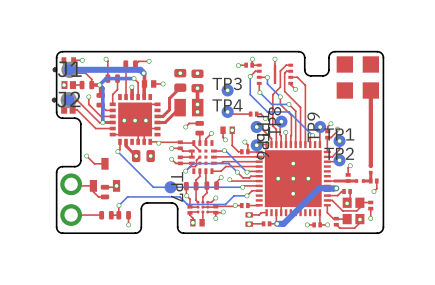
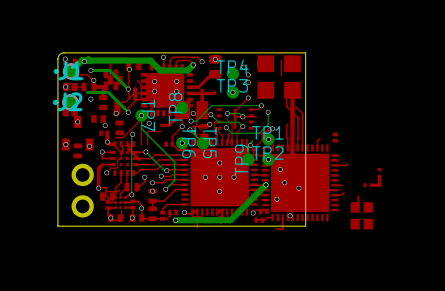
board edge: (298, 51) (303, 54) (304, 71) (310, 75) (327, 74) (329, 56) (333, 51) (378, 51) (382, 55) (383, 227) (381, 231) (182, 233) (177, 228) (177, 206) (171, 202) (143, 204) (141, 208) (141, 228) (136, 233) (61, 233) (57, 229) (56, 221) -> (305, 52) (305, 226) (57, 226)
top track: none -> (163, 57) (163, 65)
via: none -> (163, 57)
via: none -> (65, 59)
via: none -> (215, 59)
via: (106, 59) -> none
via: (252, 59) -> none
via: (274, 59) -> none
top track: none -> (202, 61) (197, 57) (173, 57) (169, 60) (169, 65)
via: none -> (202, 61)
via: (149, 61) -> none
top track: none -> (193, 64) (189, 60) (177, 60) (176, 65)
via: none -> (193, 64)
part footprint: [256, 63, 294, 85] -> [257, 55, 301, 99]
part: none -> (215, 66)
top track: (246, 65) (238, 65) -> none
part: (249, 65) -> none
top track: (290, 65) (286, 65) (280, 71) (280, 87) (272, 94) (272, 125) (276, 129) (276, 144) -> none
via: none -> (129, 69)
bottom track: none -> (90, 70) (109, 70) (128, 89)
via: none -> (90, 70)
bottom track: (69, 69) (140, 69) (143, 73) -> (71, 71) (81, 60) (88, 59) (150, 60) (160, 70) (187, 70) (193, 64)
top track: (259, 71) (255, 71) (250, 76) -> none
top track: (290, 71) (284, 73) (284, 91) (300, 107) (300, 144) -> none
part: none -> (110, 73)
top track: none -> (215, 74) (211, 74) (198, 87) (191, 87)
via: (143, 73) -> none
via: (180, 73) -> none
via: (197, 73) -> none
via: none -> (248, 74)
bottom track: (250, 76) (250, 94) (267, 111) (288, 111) (312, 135) -> none
via: (250, 76) -> none
top track: (259, 77) (267, 77) -> none
bottom track: (267, 77) (267, 83) (280, 96) -> none
via: (267, 77) -> none
top track: (290, 77) (297, 77) (305, 85) (305, 144) -> none
part: (357, 77) -> none
via: none -> (93, 80)
top track: (117, 78) (117, 89) (112, 94) (112, 104) -> none
bottom track: (134, 78) (106, 78) (99, 85) (102, 88) (102, 122) -> none
via: (134, 78) -> none
via: none -> (154, 81)
via: none -> (176, 81)
part: (180, 80) -> none
via: none -> (248, 82)
part: (197, 81) -> none
part: none -> (110, 85)
part position: (149, 83) -> (98, 118)
top track: (163, 83) (153, 83) -> none
via: (163, 83) -> none
top track: (259, 83) (259, 92) -> none
top track: (290, 83) (295, 89) -> none
via: (99, 85) -> none
via: none -> (128, 89)
via: (131, 87) -> none
top track: (180, 87) (169, 98) (169, 109) (162, 116) (157, 116) -> none
via: (197, 88) -> none
top track: none -> (292, 90) (292, 157)
via: none -> (154, 91)
via: none -> (176, 91)
via: (295, 89) -> none
bottom track: none -> (87, 92) (108, 92) (128, 112)
top track: none -> (215, 92) (191, 93)
top track: (370, 90) (370, 165) -> none
top track: none -> (142, 93) (134, 93) (125, 102) (117, 102) (116, 113)
bottom track: (259, 92) (271, 104) (288, 104) -> none
via: (259, 92) -> none
top track: none -> (248, 98) (235, 111) (235, 118)
via: none -> (248, 98)
top track: (88, 96) (88, 104) (100, 116) (112, 116) -> none
via: (280, 96) -> none
top track: none -> (142, 99) (136, 99) (128, 107) (128, 112)
top track: none -> (261, 105) (257, 109) (251, 109)
bottom track: none -> (261, 105) (211, 105) (205, 112)
via: none -> (261, 105)
via: (197, 104) -> none
via: (288, 104) -> none
top track: (100, 105) (105, 110) (112, 110) -> none
top track: (64, 109) (64, 105) (68, 101) (78, 101) (99, 122) (112, 122) -> none
top track: (72, 109) (77, 109) (95, 128) (112, 128) -> none
via: none -> (128, 112)
bottom track: none -> (205, 112) (196, 121) (191, 121)
bottom track: none -> (268, 112) (268, 124) (259, 133) (231, 133) (226, 127)
via: none -> (268, 112)
via: none -> (116, 113)
top track: none -> (193, 113) (196, 116) (196, 125) (207, 136) (207, 140)
via: none -> (193, 113)
top track: none -> (227, 113) (227, 120) (232, 124) (232, 140)
bottom track: none -> (227, 113) (239, 113) (242, 116)
via: none -> (227, 113)
via: (197, 111) -> none
bottom track: none -> (210, 114) (218, 122) (238, 122) (242, 126)
via: none -> (210, 114)
TP4 position: (227, 111) -> (232, 73)
via: (227, 111) -> none
board edge: (56, 112) (59, 117) (76, 118) (80, 124) (80, 163) (75, 166) (60, 167) (56, 172) -> (57, 114) (57, 176)
top track: none -> (182, 115) (182, 126) (172, 136) (172, 144) (178, 150) (183, 150)
bottom track: none -> (141, 115) (141, 128) (174, 161) (174, 180) (165, 189)
via: none -> (141, 115)
via: none -> (242, 116)
part: (253, 114) -> none
top track: (256, 114) (261, 114) (265, 118) -> none
part: none -> (235, 118)
via: none -> (191, 121)
via: (265, 118) -> none
via: none -> (77, 121)
part position: (135, 119) -> (166, 90)
top track: none -> (218, 122) (214, 123) (214, 132) (217, 135) (217, 140)
via: (124, 120) -> none
via: (135, 120) -> none
via: none -> (209, 124)
TP8 position: (281, 121) -> (182, 107)
via: (281, 121) -> none
via: none -> (182, 126)
top track: none -> (242, 126) (237, 132) (237, 140)
via: none -> (242, 126)
top track: (330, 123) (327, 127) (327, 131) -> none
via: (330, 123) -> none
via: none -> (226, 127)
part: none -> (119, 127)
top track: none -> (218, 128) (222, 140)
top track: none -> (272, 128) (262, 133) (262, 140) (256, 146) (256, 150)
via: none -> (272, 128)
top track: (256, 127) (259, 127) (271, 138) (271, 144) -> none
TP5 position: (256, 127) -> (203, 143)
via: (256, 127) -> none
top track: (320, 127) (319, 144) -> none
TP9 position: (320, 127) -> (248, 159)
via: (320, 127) -> none
top track: none -> (192, 131) (197, 135) (197, 140)
bottom track: none -> (192, 131) (203, 143)
top track: (337, 129) (331, 137) (327, 137) (327, 152) -> none
via: (337, 129) -> none
part: none -> (104, 133)
top track: none -> (107, 133) (107, 141) (109, 144) (114, 144) (121, 152)
part: (227, 130) -> none
top track: (232, 130) (232, 145) (238, 151) (241, 151) -> none
via: (232, 130) -> none
bottom track: none -> (132, 134) (131, 194)
via: none -> (132, 134)
via: (285, 132) -> none
via: (211, 133) -> none
via: (312, 135) -> none
via: none -> (268, 139)
bottom track: none -> (252, 140) (248, 145) (248, 159)
via: none -> (107, 142)
via: none -> (182, 143)
via: (225, 139) -> none
part: none -> (169, 144)
top track: (339, 140) (339, 149) (332, 156) (327, 156) -> none
TP1 position: (339, 140) -> (268, 139)
via: (339, 140) -> none
via: none -> (65, 144)
top track: (150, 141) (193, 143) (199, 151) -> none
via: none -> (89, 146)
via: (158, 143) -> none
part: (180, 145) -> none
TP6 position: (256, 145) -> (182, 143)
via: (256, 145) -> none
part: none -> (77, 150)
via: none -> (102, 151)
top track: none -> (112, 152) (102, 151) (102, 158) (112, 158)
bottom track: none -> (145, 151) (166, 170)
via: none -> (145, 151)
top track: (171, 148) (191, 151) (191, 157) (180, 157) -> none
via: (171, 148) -> none
top track: (224, 150) (213, 151) -> (145, 151) (135, 152)
bottom track: (224, 150) (247, 172) -> none
via: (224, 150) -> none
bottom track: (117, 151) (153, 187) (242, 187) -> none
via: (117, 151) -> none
top track: none -> (183, 154) (155, 154) (151, 158) (135, 158)
part: (244, 151) -> none
top track: none -> (121, 158) (117, 159) (117, 167) (111, 168) (106, 172)
top track: (86, 156) (94, 163) (104, 163) -> none
via: (86, 156) -> none
via: (136, 156) -> none
part: (143, 156) -> none
via: (150, 156) -> none
top track: none -> (183, 159) (158, 159) (154, 164) (135, 164)
top track: (259, 156) (213, 157) -> none
via: none -> (268, 159)
top track: (199, 157) (196, 160) (196, 165) (190, 166) (185, 171) -> none
part position: (202, 157) -> (124, 158)
top track: (171, 159) (175, 163) (191, 163) -> none
via: (171, 159) -> none
via: none -> (219, 162)
part: (180, 160) -> none
TP2 position: (339, 160) -> (268, 159)
via: (339, 160) -> none
top track: none -> (112, 164) (102, 164) (98, 168) (98, 188) (105, 187) (108, 201) (115, 202)
top track: none -> (183, 164) (161, 164) (156, 169) (140, 169) (137, 172) (133, 172)
top track: (259, 161) (213, 163) -> none
via: (293, 163) -> none
via: none -> (280, 169)
top track: (350, 165) (348, 167) (348, 174) -> none
via: (350, 165) -> none
via: none -> (166, 170)
top track: none -> (183, 169) (166, 170)
top track: (259, 166) (225, 166) (221, 171) (211, 171) -> none
via: none -> (106, 172)
top track: none -> (121, 172) (121, 182) (115, 188) (115, 197)
top track: none -> (127, 172) (126, 187) (120, 193) (120, 197)
top track: none -> (183, 174) (161, 176)
bottom track: (185, 171) (193, 163) (228, 163) (237, 172) -> none
via: (185, 171) -> none
top track: (199, 171) (199, 176) (196, 180) (196, 200) (198, 202) -> none
top track: (205, 171) (206, 192) (202, 196) (202, 202) -> none
via: none -> (161, 176)
top track: (237, 172) (242, 177) (259, 176) -> none
via: (237, 172) -> none
via: (247, 172) -> none
top track: none -> (144, 177) (144, 181) (136, 187)
via: none -> (144, 177)
via: none -> (205, 177)
part: none -> (219, 177)
via: none -> (219, 177)
via: none -> (233, 177)
part position: (104, 174) -> (77, 133)
top track: none -> (183, 179) (165, 179) (162, 182) (152, 182)
top track: (221, 177) (216, 182) (216, 185) -> none
via: (221, 177) -> none
part: (348, 177) -> none
via: none -> (152, 182)
via: (293, 178) -> none
via: (308, 178) -> none
via: (229, 179) -> none
top track: none -> (183, 184) (170, 184) (165, 189)
bottom track: none -> (265, 184) (230, 220) (175, 220)
via: none -> (265, 184)
top track: (356, 181) (334, 181) -> none
part: (373, 181) -> none
top track: (376, 181) (376, 188) (373, 191) -> none
part: none -> (131, 187)
top track: (71, 184) (93, 185) (93, 191) (98, 196) (104, 196) -> none
via: none -> (98, 188)
via: none -> (298, 188)
via: (116, 185) -> none
via: none -> (165, 189)
top track: none -> (183, 189) (175, 189) (163, 201) (152, 201) (152, 208)
part: (211, 185) -> none
via: none -> (152, 191)
top track: (186, 186) (186, 195) (189, 199) (189, 206) (198, 207) -> none
part: (191, 186) -> none
TP7 position: (170, 187) -> (141, 115)
via: none -> (219, 191)
via: (242, 187) -> none
bottom track: (336, 188) (319, 188) (283, 223) (277, 223) -> none
via: (336, 188) -> none
top track: none -> (131, 194) (125, 197)
via: none -> (131, 194)
part: none -> (152, 196)
top track: (344, 191) (337, 195) (327, 195) -> none
part: (347, 191) -> none
via: (373, 191) -> none
part rotation: 0° (104, 192) -> 90° clockwise (107, 196)
via: (293, 193) -> none
via: none -> (276, 199)
via: (186, 195) -> none
bottom track: (247, 195) (234, 195) (225, 204) (187, 204) (179, 196) (127, 196) (118, 205) -> none
via: (247, 195) -> none
top track: none -> (120, 202) (138, 201) (141, 204) (141, 217) (152, 218)
top track: (215, 198) (211, 202) (207, 202) -> none
via: (215, 198) -> none
part position: (71, 199) -> (82, 190)
part: none -> (132, 204)
top track: none -> (183, 204) (167, 204) (162, 209) (162, 212)
part: none -> (108, 205)
top track: (327, 200) (332, 200) (342, 210) (356, 210) (359, 207) (360, 202) (370, 202) -> none
top track: none -> (115, 207) (108, 208) (108, 215) (110, 217)
top track: none -> (125, 207) (132, 207) (132, 217)
via: none -> (141, 208)
via: (347, 203) -> none
via: (118, 205) -> none
via: (235, 205) -> none
top track: (241, 205) (202, 207) -> none
part: (244, 205) -> none
top track: (327, 205) (327, 212) (333, 218) (347, 219) -> none
part: (370, 205) -> none
part: none -> (263, 211)
top track: none -> (169, 212) (167, 218) (152, 218)
part: none -> (173, 212)
top track: none -> (184, 212) (192, 213)
via: none -> (184, 212)
part position: (202, 207) -> (120, 202)
part: none -> (152, 213)
via: none -> (253, 213)
top track: (370, 208) (370, 218) -> none
part: none -> (162, 215)
via: none -> (290, 215)
top track: (202, 212) (202, 222) -> none
top track: (207, 212) (215, 212) -> none
via: (223, 212) -> none
part footprint: [245, 212, 253, 227] -> [254, 217, 265, 223]
top track: (319, 212) (319, 224) (327, 224) -> none
via: none -> (110, 217)
part: none -> (115, 217)
via: none -> (132, 217)
part: none -> (137, 217)
via: (249, 214) -> none
top track: (71, 215) (101, 215) -> none
part: (106, 215) -> none
part: (123, 215) -> none
top track: (128, 215) (128, 224) -> none
via: none -> (175, 220)
via: (215, 218) -> none
via: (370, 218) -> none
top track: (359, 219) (359, 222) (354, 228) (339, 228) (336, 224) -> none
via: (359, 219) -> none
part: (336, 221) -> none
via: (192, 222) -> none
part: (197, 222) -> none
top track: (263, 223) (249, 224) -> none
part: (266, 223) -> none
via: (277, 223) -> none
via: (128, 224) -> none
via: (249, 224) -> none
via: (307, 224) -> none
top track: (314, 224) (307, 224) -> none
part: (317, 224) -> none
via: (327, 224) -> none

